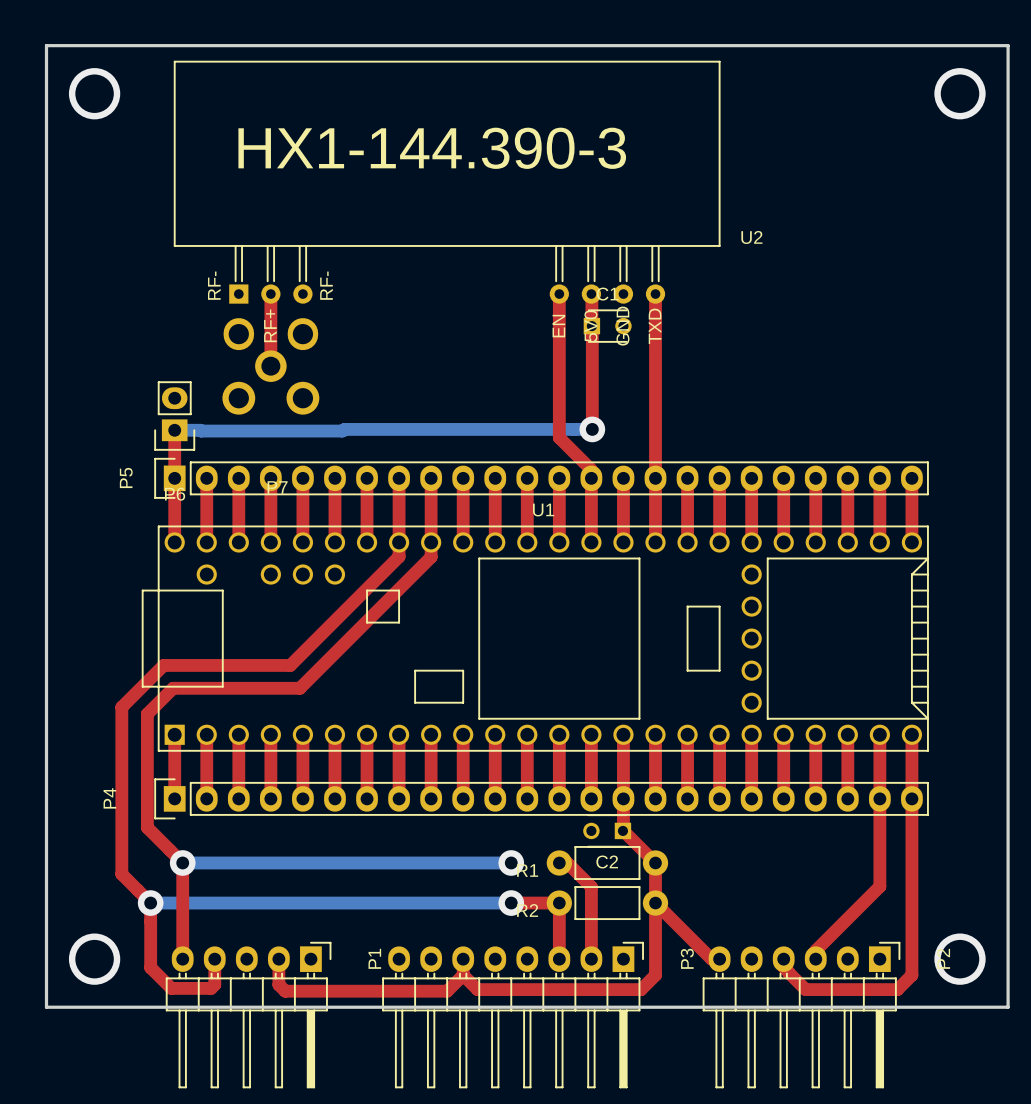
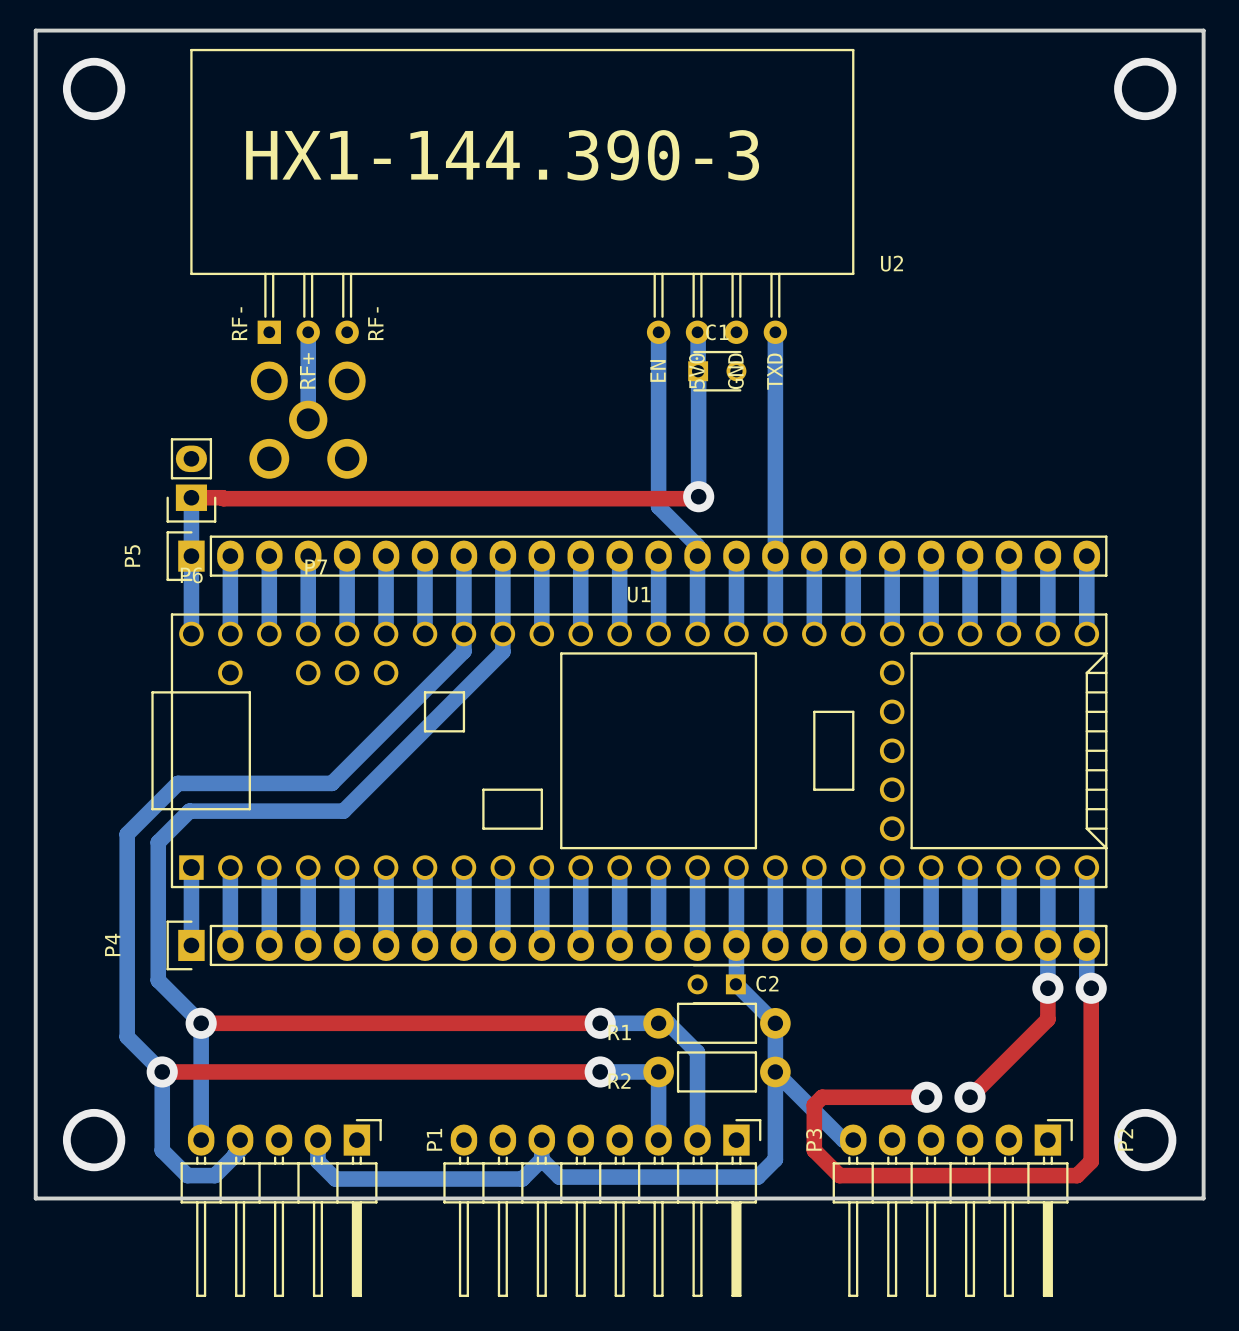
top track: (270, 294) (270, 366) -> none
bottom track: none -> (308, 332) (308, 419)
top track: (559, 294) (559, 437) (591, 469) (591, 542) -> none
bottom track: none -> (658, 332) (658, 506) (697, 545) (697, 633)
top track: (591, 294) (593, 429) -> none
top track: (655, 294) (655, 542) -> none
bottom track: none -> (775, 332) (775, 633)
bottom track: (592, 429) (343, 430) -> (698, 496) (697, 332)
top track: (174, 430) (174, 542) -> (191, 497) (696, 498) (698, 496)
bottom track: (174, 430) (342, 430) -> (191, 497) (191, 633)
top track: (399, 476) (399, 556) (290, 665) (163, 665) (121, 707) (121, 874) (150, 903) (150, 967) (171, 988) (211, 988) (214, 984) (214, 959) -> none
bottom track: none -> (463, 553) (463, 651) (331, 783) (178, 783) (127, 834) (127, 1036) (162, 1071) (162, 1150) (187, 1175) (214, 1175) (240, 1149) (240, 1140)
top track: (431, 476) (431, 557) (299, 688) (173, 688) (147, 714) (147, 827) (182, 862) (182, 959) -> none
bottom track: none -> (502, 553) (502, 651) (343, 811) (189, 811) (158, 842) (158, 980) (201, 1023) (201, 1140)
top track: (206, 478) (206, 542) -> none
bottom track: none -> (230, 556) (230, 633)
top track: (238, 478) (238, 542) -> none
bottom track: none -> (269, 556) (269, 633)
top track: (270, 478) (270, 542) -> none
bottom track: none -> (308, 556) (308, 633)
top track: (302, 478) (302, 542) -> none
bottom track: none -> (347, 556) (347, 633)
top track: (334, 478) (334, 542) -> none
bottom track: none -> (386, 556) (386, 633)
top track: (367, 478) (367, 542) -> none
bottom track: none -> (425, 556) (425, 633)
top track: (463, 478) (463, 542) -> none
bottom track: none -> (541, 556) (541, 633)
top track: (495, 478) (495, 542) -> none
bottom track: none -> (580, 556) (580, 633)
top track: (527, 478) (527, 542) -> none
bottom track: none -> (619, 556) (619, 633)
top track: (559, 478) (559, 542) -> none
bottom track: none -> (658, 556) (658, 633)
top track: (623, 478) (623, 542) -> none
bottom track: none -> (736, 556) (736, 633)
top track: (687, 478) (687, 542) -> none
bottom track: none -> (814, 556) (814, 633)
top track: (719, 478) (719, 542) -> none
bottom track: none -> (853, 556) (853, 633)
top track: (751, 478) (751, 542) -> none
bottom track: none -> (892, 556) (892, 633)
top track: (783, 478) (783, 542) -> none
bottom track: none -> (931, 556) (931, 633)
top track: (815, 478) (815, 542) -> none
bottom track: none -> (970, 556) (970, 633)
top track: (847, 478) (847, 542) -> none
bottom track: none -> (1008, 556) (1008, 633)
top track: (879, 478) (879, 542) -> none
bottom track: none -> (1047, 556) (1047, 633)
top track: (911, 478) (911, 542) -> none
bottom track: none -> (1086, 556) (1086, 633)
top track: (174, 734) (174, 798) -> none
bottom track: none -> (191, 867) (191, 945)
top track: (206, 734) (206, 798) -> none
bottom track: none -> (230, 867) (230, 945)
top track: (238, 734) (238, 798) -> none
bottom track: none -> (269, 867) (269, 945)
top track: (270, 734) (270, 798) -> none
bottom track: none -> (308, 867) (308, 945)
top track: (302, 734) (302, 798) -> none
bottom track: none -> (347, 867) (347, 945)
top track: (334, 734) (334, 798) -> none
bottom track: none -> (386, 867) (386, 945)
top track: (367, 734) (367, 798) -> none
bottom track: none -> (425, 867) (425, 945)
top track: (399, 734) (399, 798) -> none
bottom track: none -> (463, 867) (463, 945)
top track: (431, 734) (431, 798) -> none
bottom track: none -> (502, 867) (502, 945)
top track: (463, 734) (463, 798) -> none
bottom track: none -> (541, 867) (541, 945)
top track: (495, 734) (495, 798) -> none
bottom track: none -> (580, 867) (580, 945)
top track: (527, 734) (527, 798) -> none
bottom track: none -> (619, 867) (619, 945)
top track: (559, 734) (559, 798) -> none
bottom track: none -> (658, 867) (658, 945)
top track: (591, 734) (591, 798) -> none
bottom track: none -> (697, 867) (697, 945)
top track: (623, 734) (623, 830) (655, 862) -> none
bottom track: none -> (736, 867) (736, 984) (775, 1023)
top track: (655, 734) (655, 798) -> none
bottom track: none -> (775, 867) (775, 945)
top track: (687, 734) (687, 798) -> none
bottom track: none -> (814, 867) (814, 945)
top track: (719, 734) (719, 798) -> none
bottom track: none -> (853, 867) (853, 945)
top track: (751, 734) (751, 798) -> none
bottom track: none -> (892, 867) (892, 945)
top track: (783, 734) (783, 798) -> none
bottom track: none -> (931, 867) (931, 945)
top track: (815, 734) (815, 798) -> none
bottom track: none -> (970, 867) (970, 945)
top track: (847, 734) (847, 798) -> none
bottom track: none -> (1008, 867) (1008, 945)
top track: (879, 734) (879, 834) -> none
bottom track: none -> (1047, 867) (1047, 988)
top track: (911, 734) (911, 975) (897, 989) (805, 989) (783, 967) (783, 959) -> none
bottom track: none -> (1086, 867) (1086, 983) (1091, 988)
via: none -> (1047, 988)
top track: none -> (1091, 988) (1091, 1161) (1077, 1175) (839, 1175) (814, 1150) (814, 1105) (822, 1097) (926, 1097)
via: none -> (1091, 988)
top track: (879, 859) (879, 886) (815, 950) (815, 959) -> (1047, 1019) (970, 1097)
top track: none -> (201, 1023) (600, 1023)
bottom track: (182, 862) (511, 862) -> (697, 1140) (697, 1052) (668, 1023) (600, 1023)
top track: (559, 862) (567, 862) (591, 887) (591, 959) -> none
C2 name position: C2 (607, 862) -> C2 (767, 983)
top track: (655, 871) (655, 975) (641, 989) (477, 989) (463, 975) -> none
bottom track: none -> (775, 1033) (775, 1159) (757, 1177) (559, 1177) (541, 1159)
bottom track: (150, 903) (511, 903) -> (658, 1140) (658, 1071) (600, 1071)
top track: (511, 903) (559, 903) (559, 959) -> (600, 1071) (162, 1071)
top track: (655, 903) (711, 959) (719, 959) -> none
bottom track: none -> (775, 1071) (843, 1140) (853, 1140)
via: none -> (926, 1097)
via: none -> (970, 1097)
top track: (278, 959) (278, 984) (285, 991) (447, 991) (463, 975) -> none
bottom track: none -> (317, 1140) (317, 1161) (335, 1179) (522, 1179) (541, 1159)

